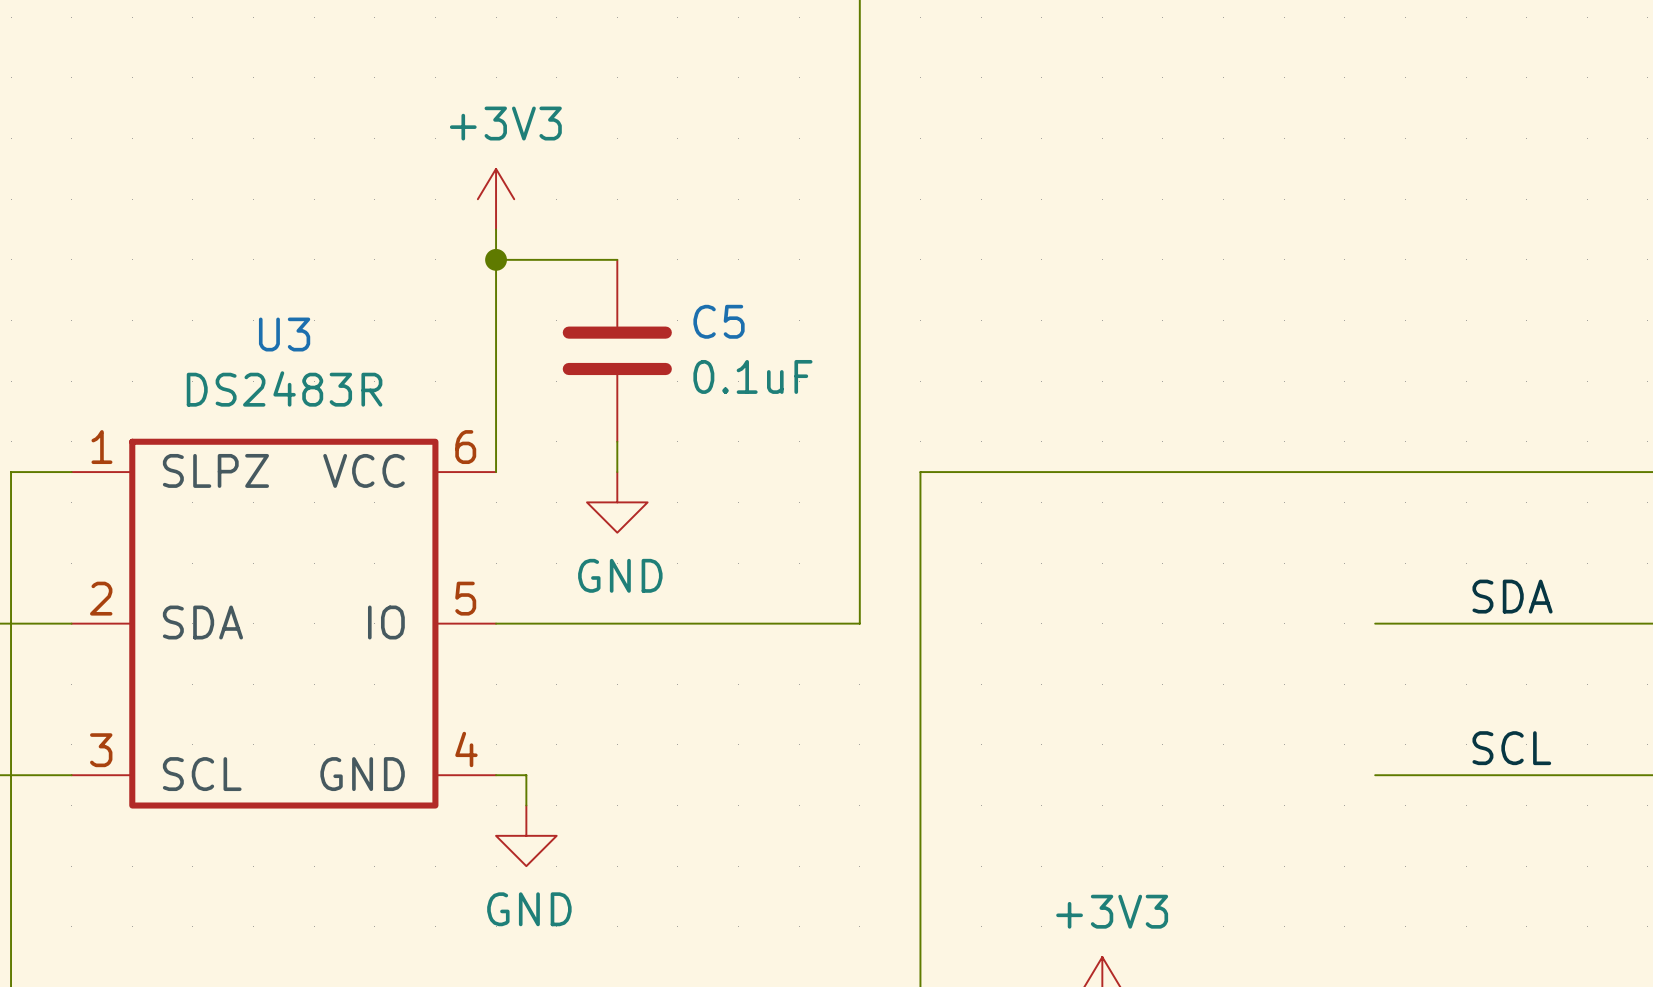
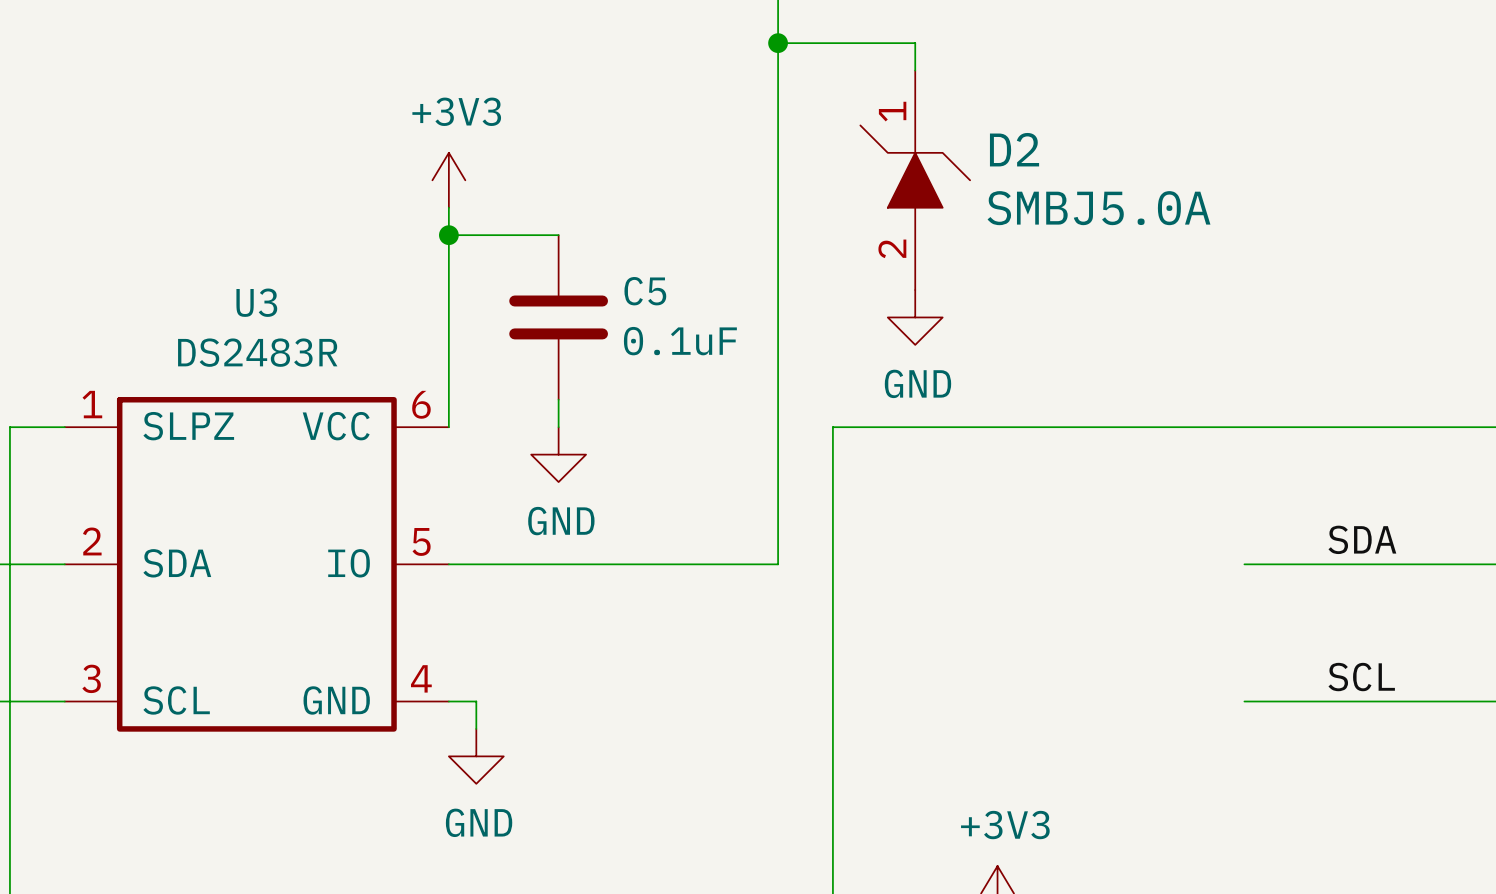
wire: none -> (778, 43) (915, 43) (915, 70)
junction: none -> (778, 43)
D2: none -> SMBJ5.0A (915, 180)
power symbol: none -> GND (915, 317)

